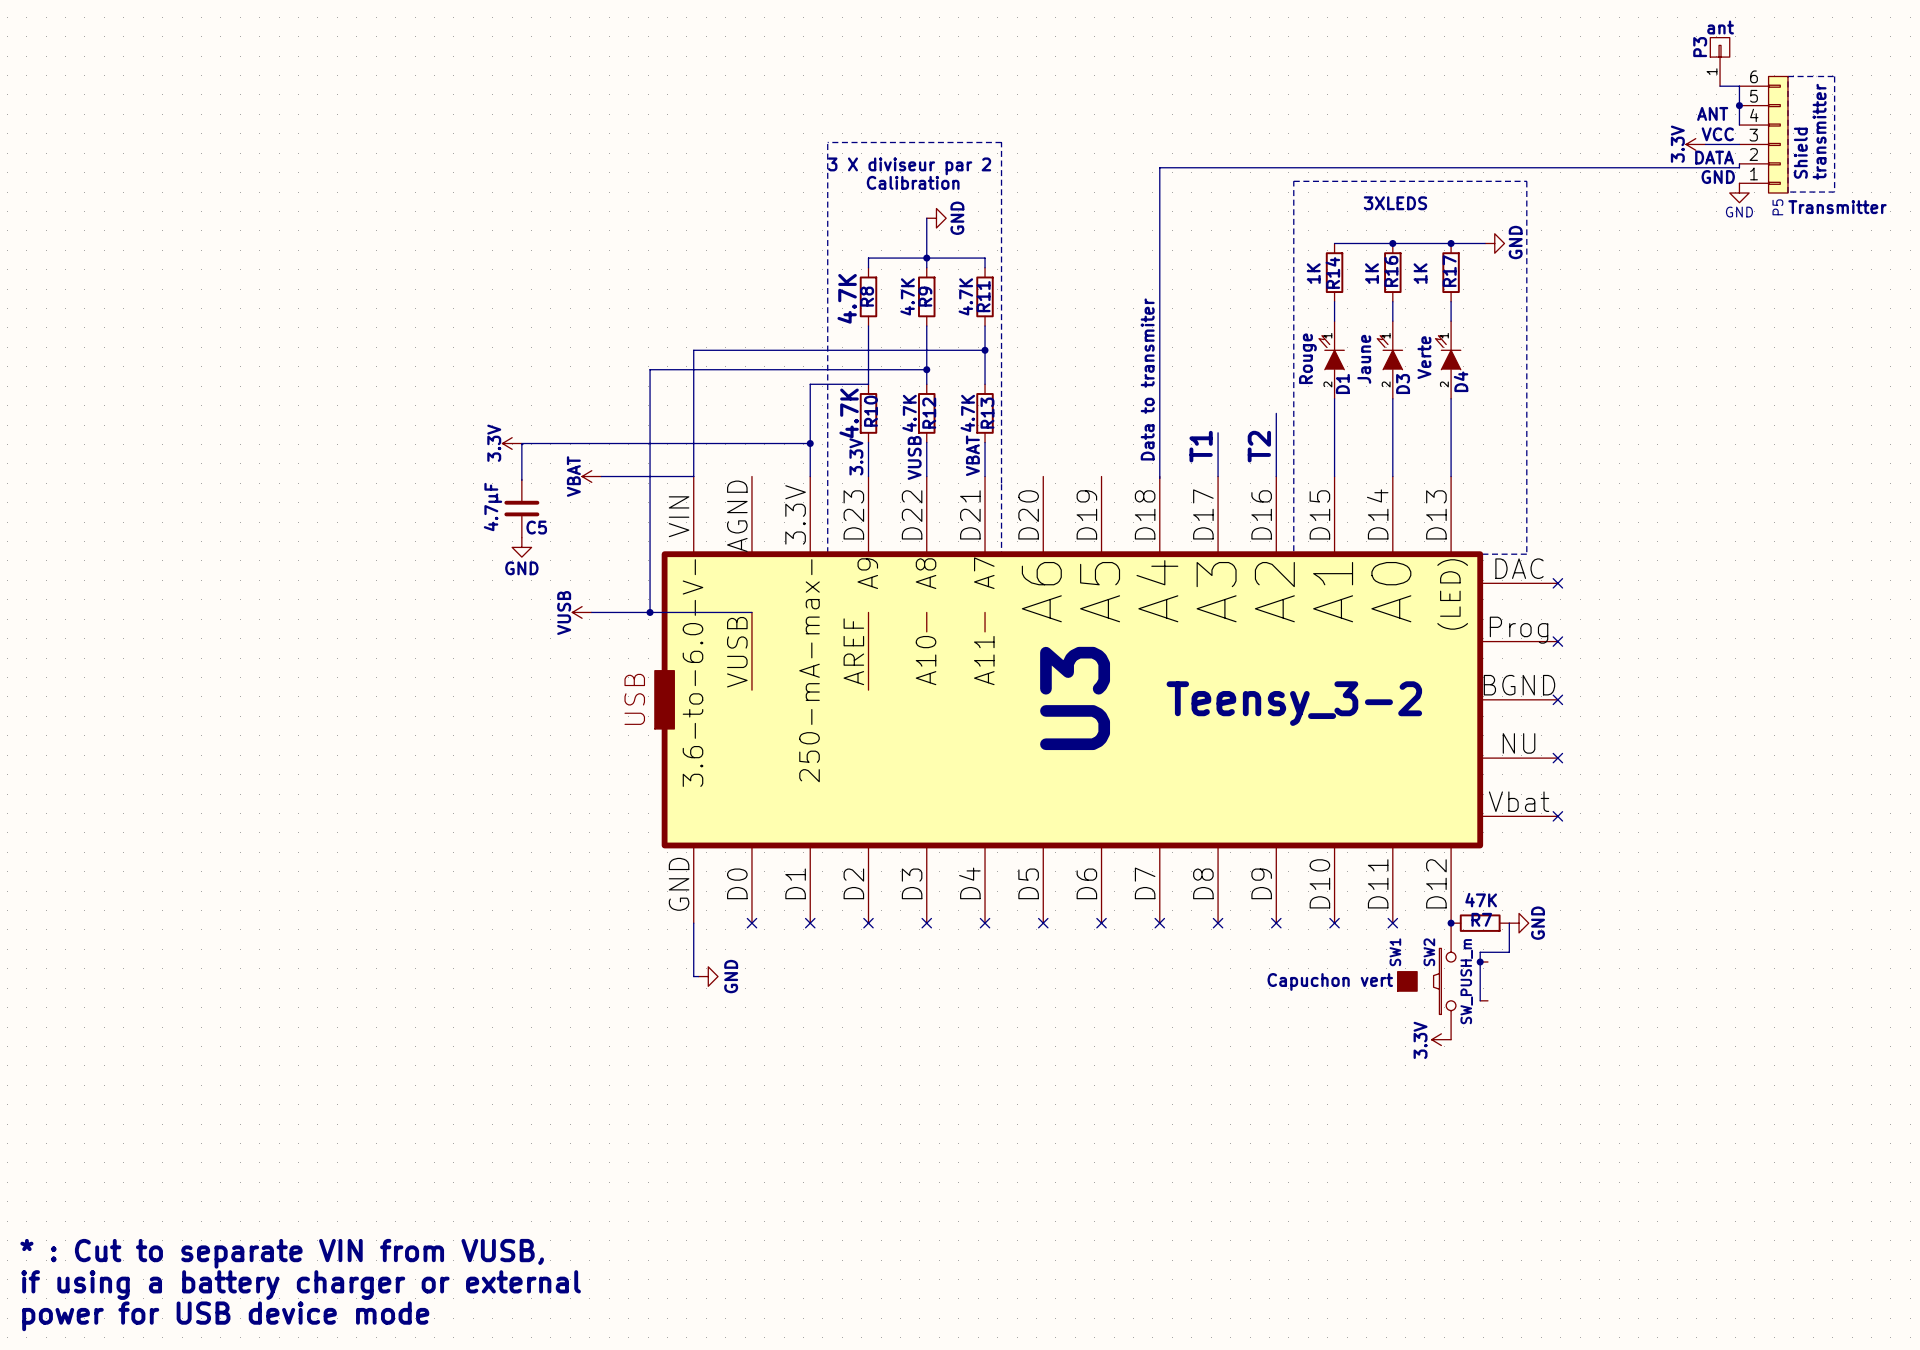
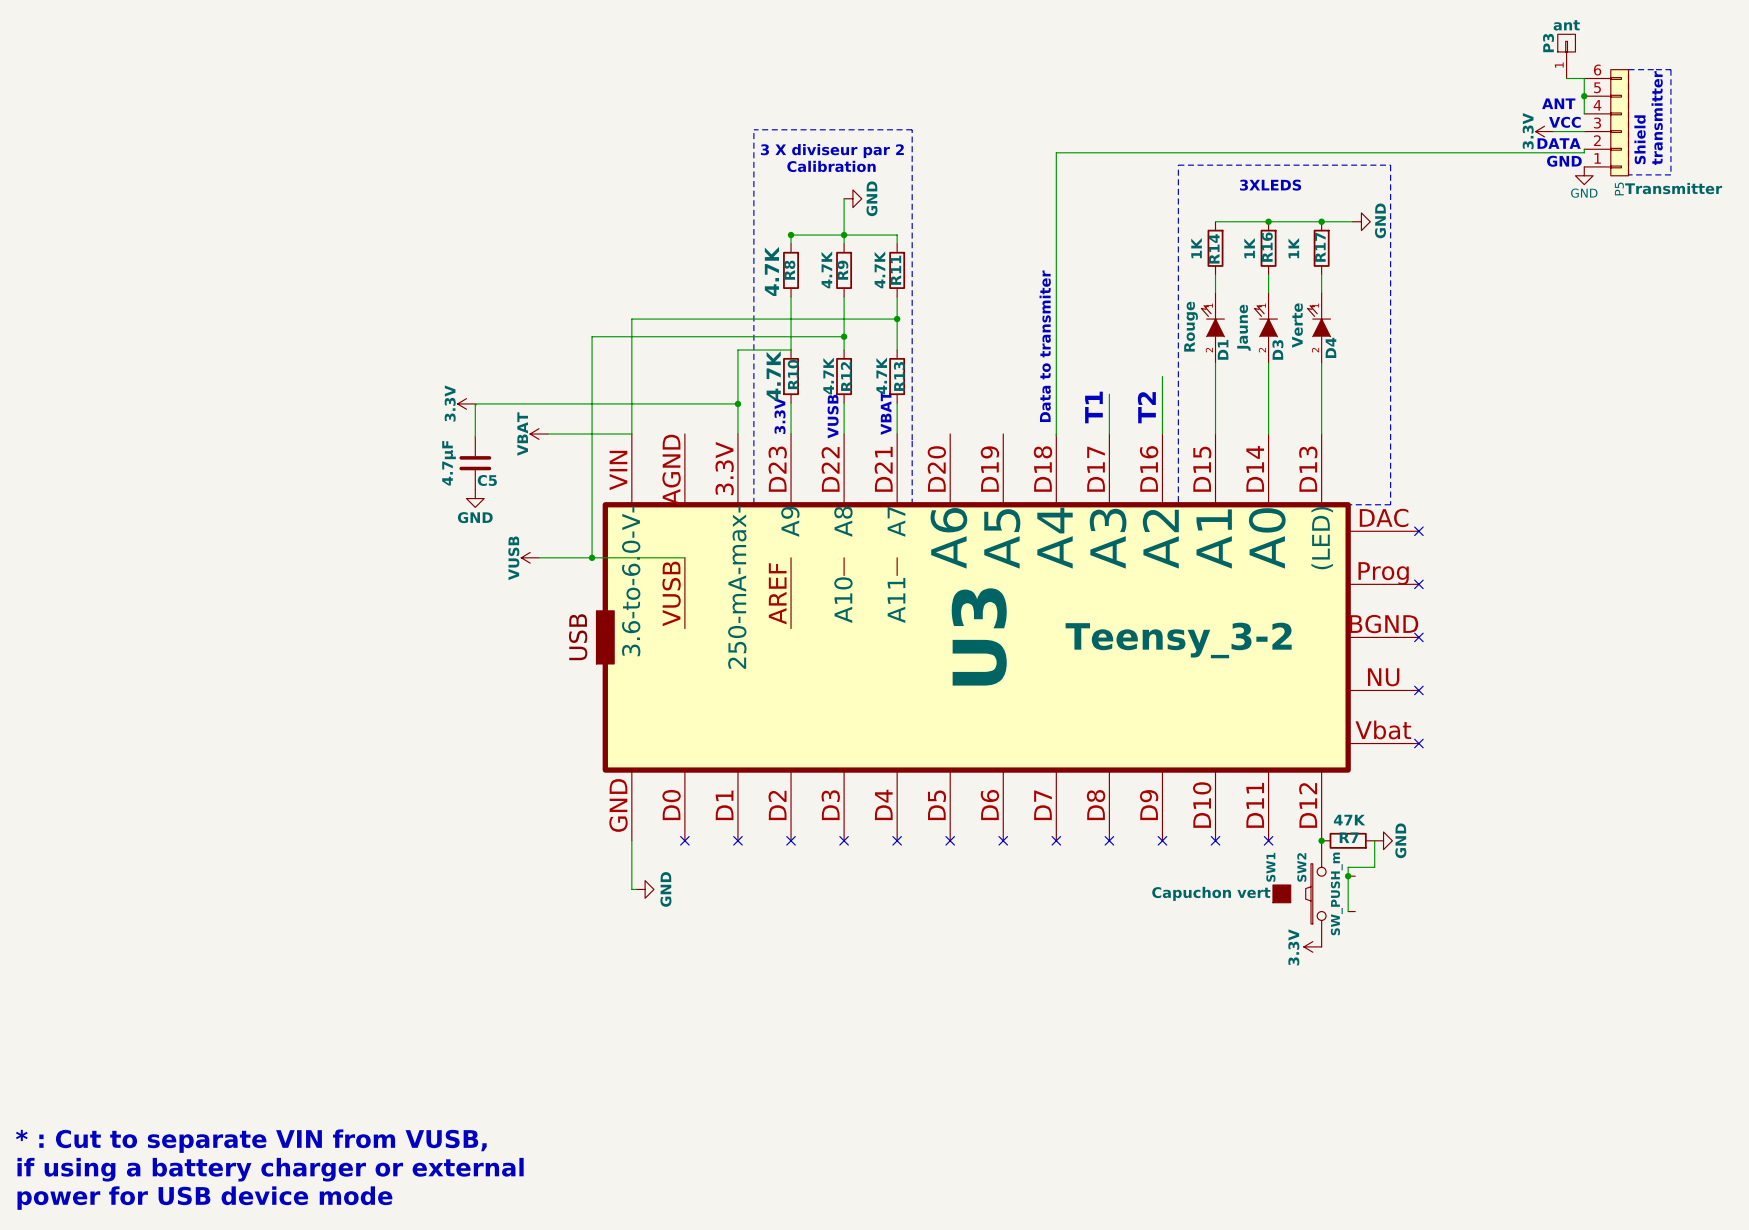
junction: none -> (791, 235)

